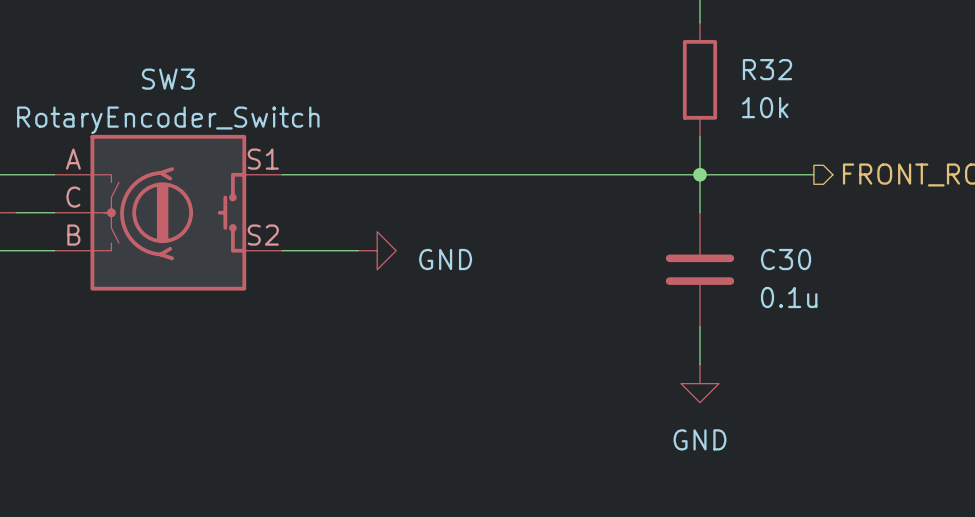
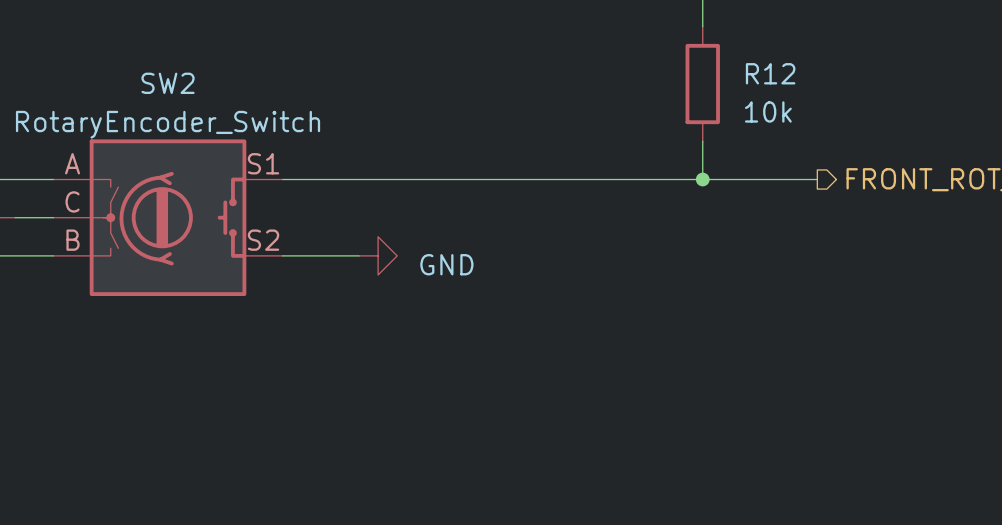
R32 name: R32 (767, 69) -> R12 (770, 73)
SW3 name: SW3 (168, 79) -> SW2 (168, 83)
wire: (699, 174) (699, 212) -> none
C30: 0.1u (699, 269) -> none
wire: (699, 326) (699, 364) -> none
power symbol: GND (699, 383) -> none

